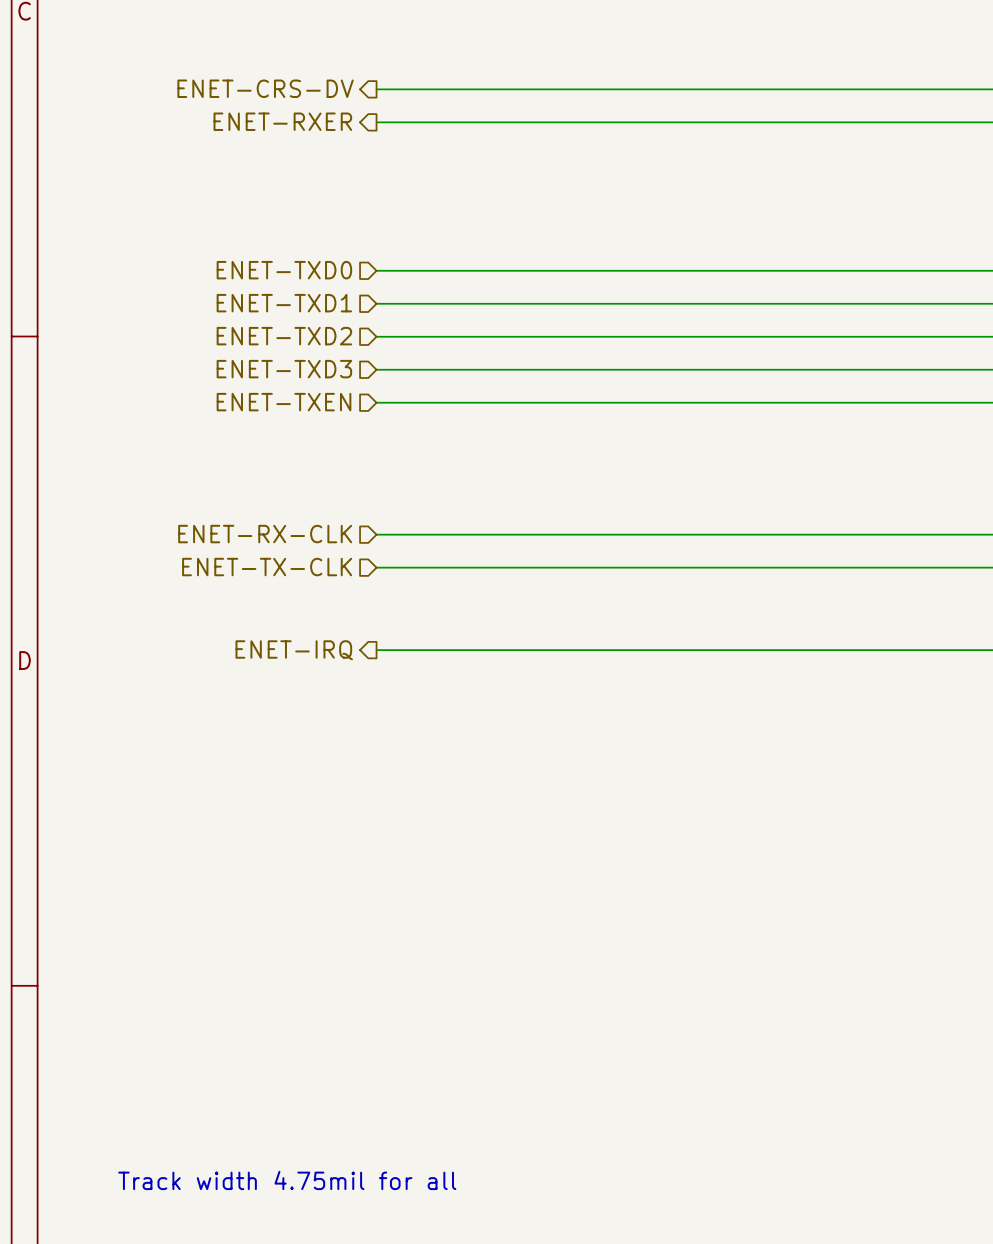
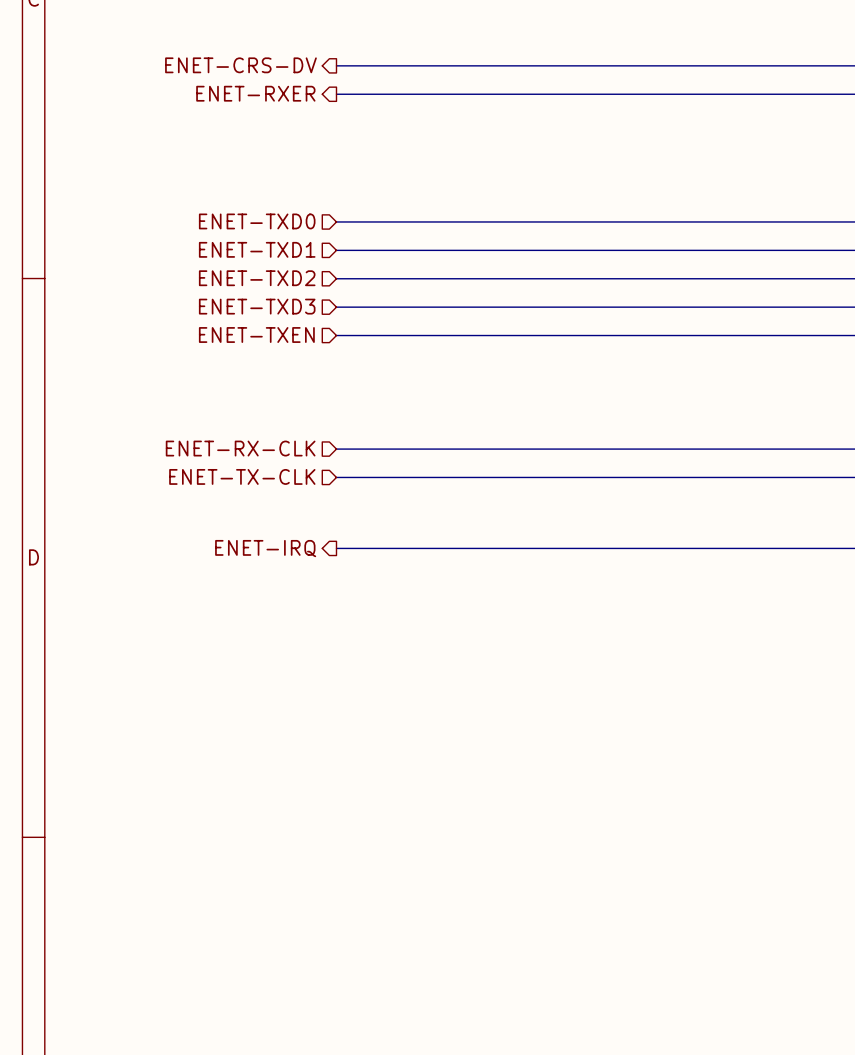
text: Track width 4.75mil for all (287, 1180) -> none

